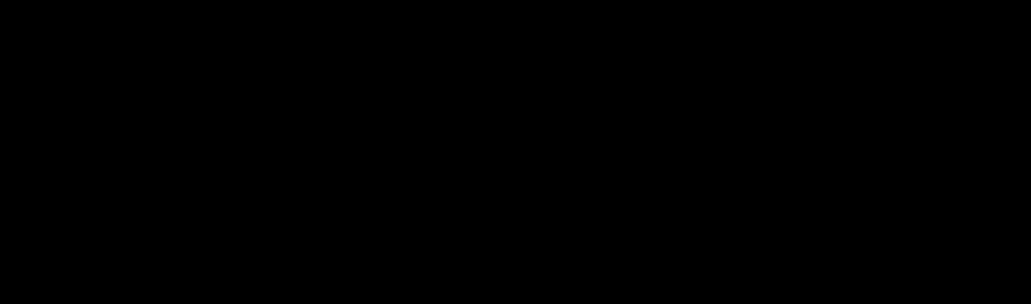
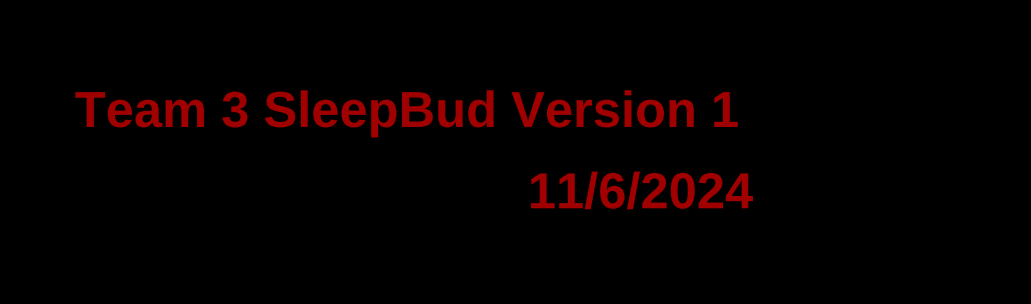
text: none -> Team 3 SleepBud Version 1 (406, 113)
text: none -> 11/6/2024 (641, 190)

